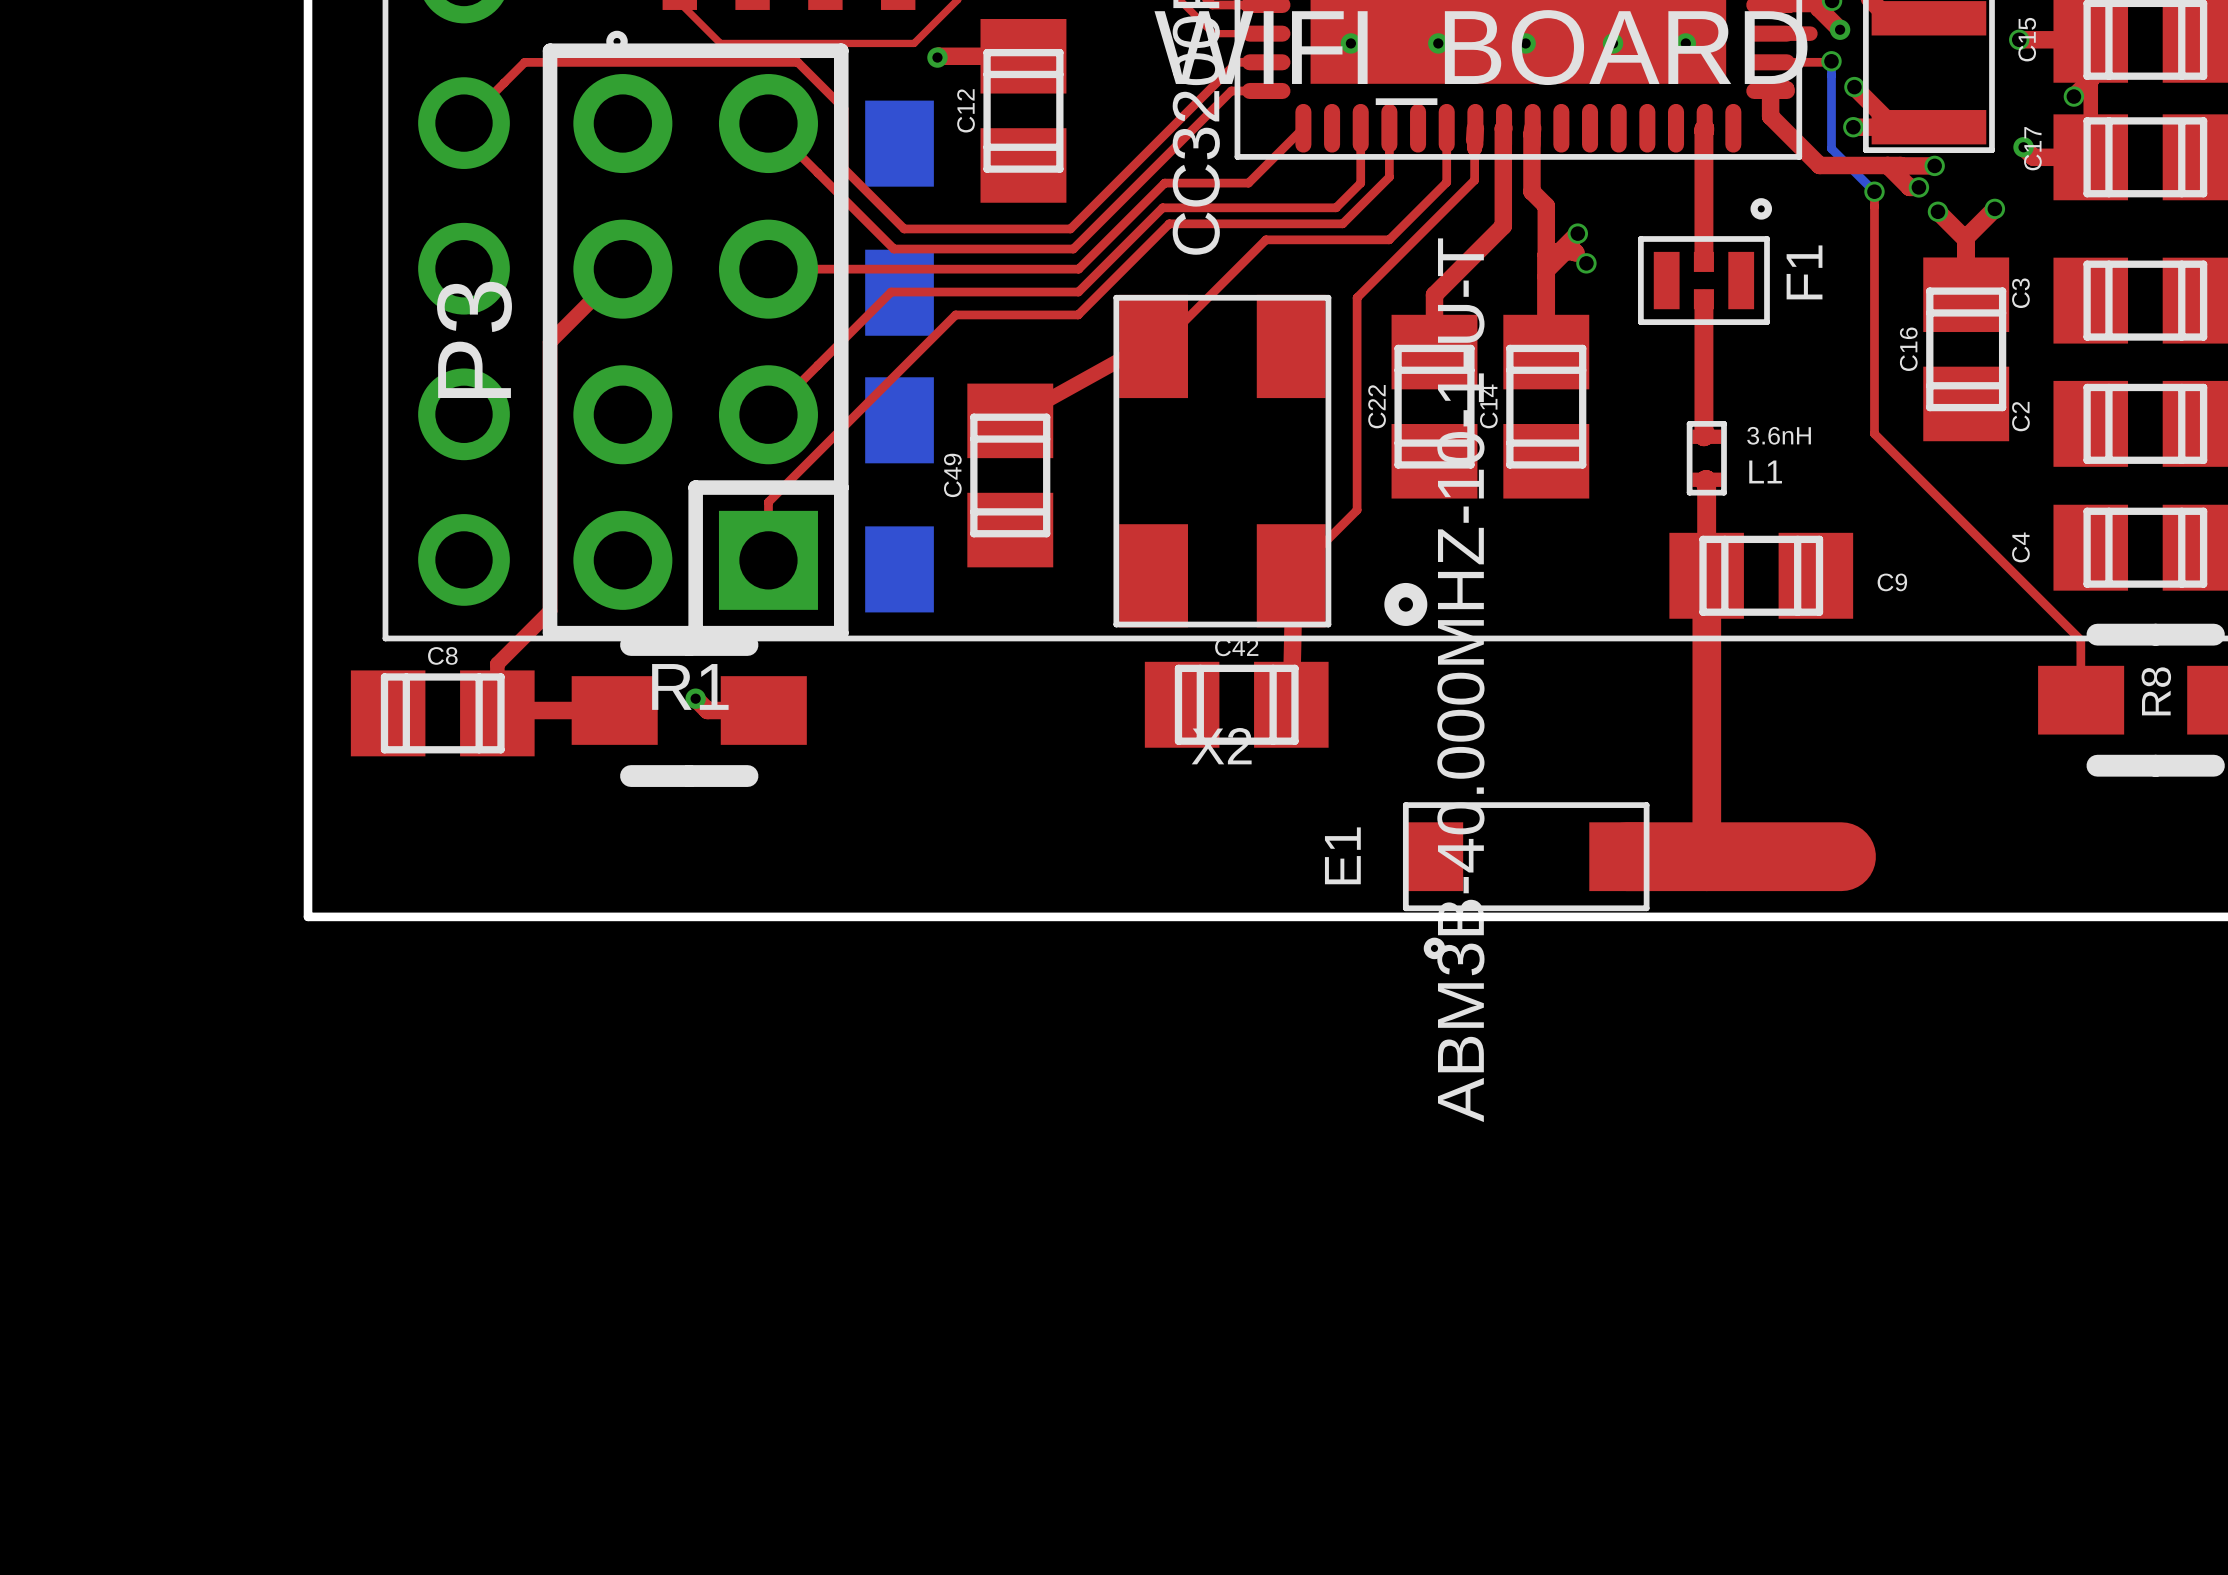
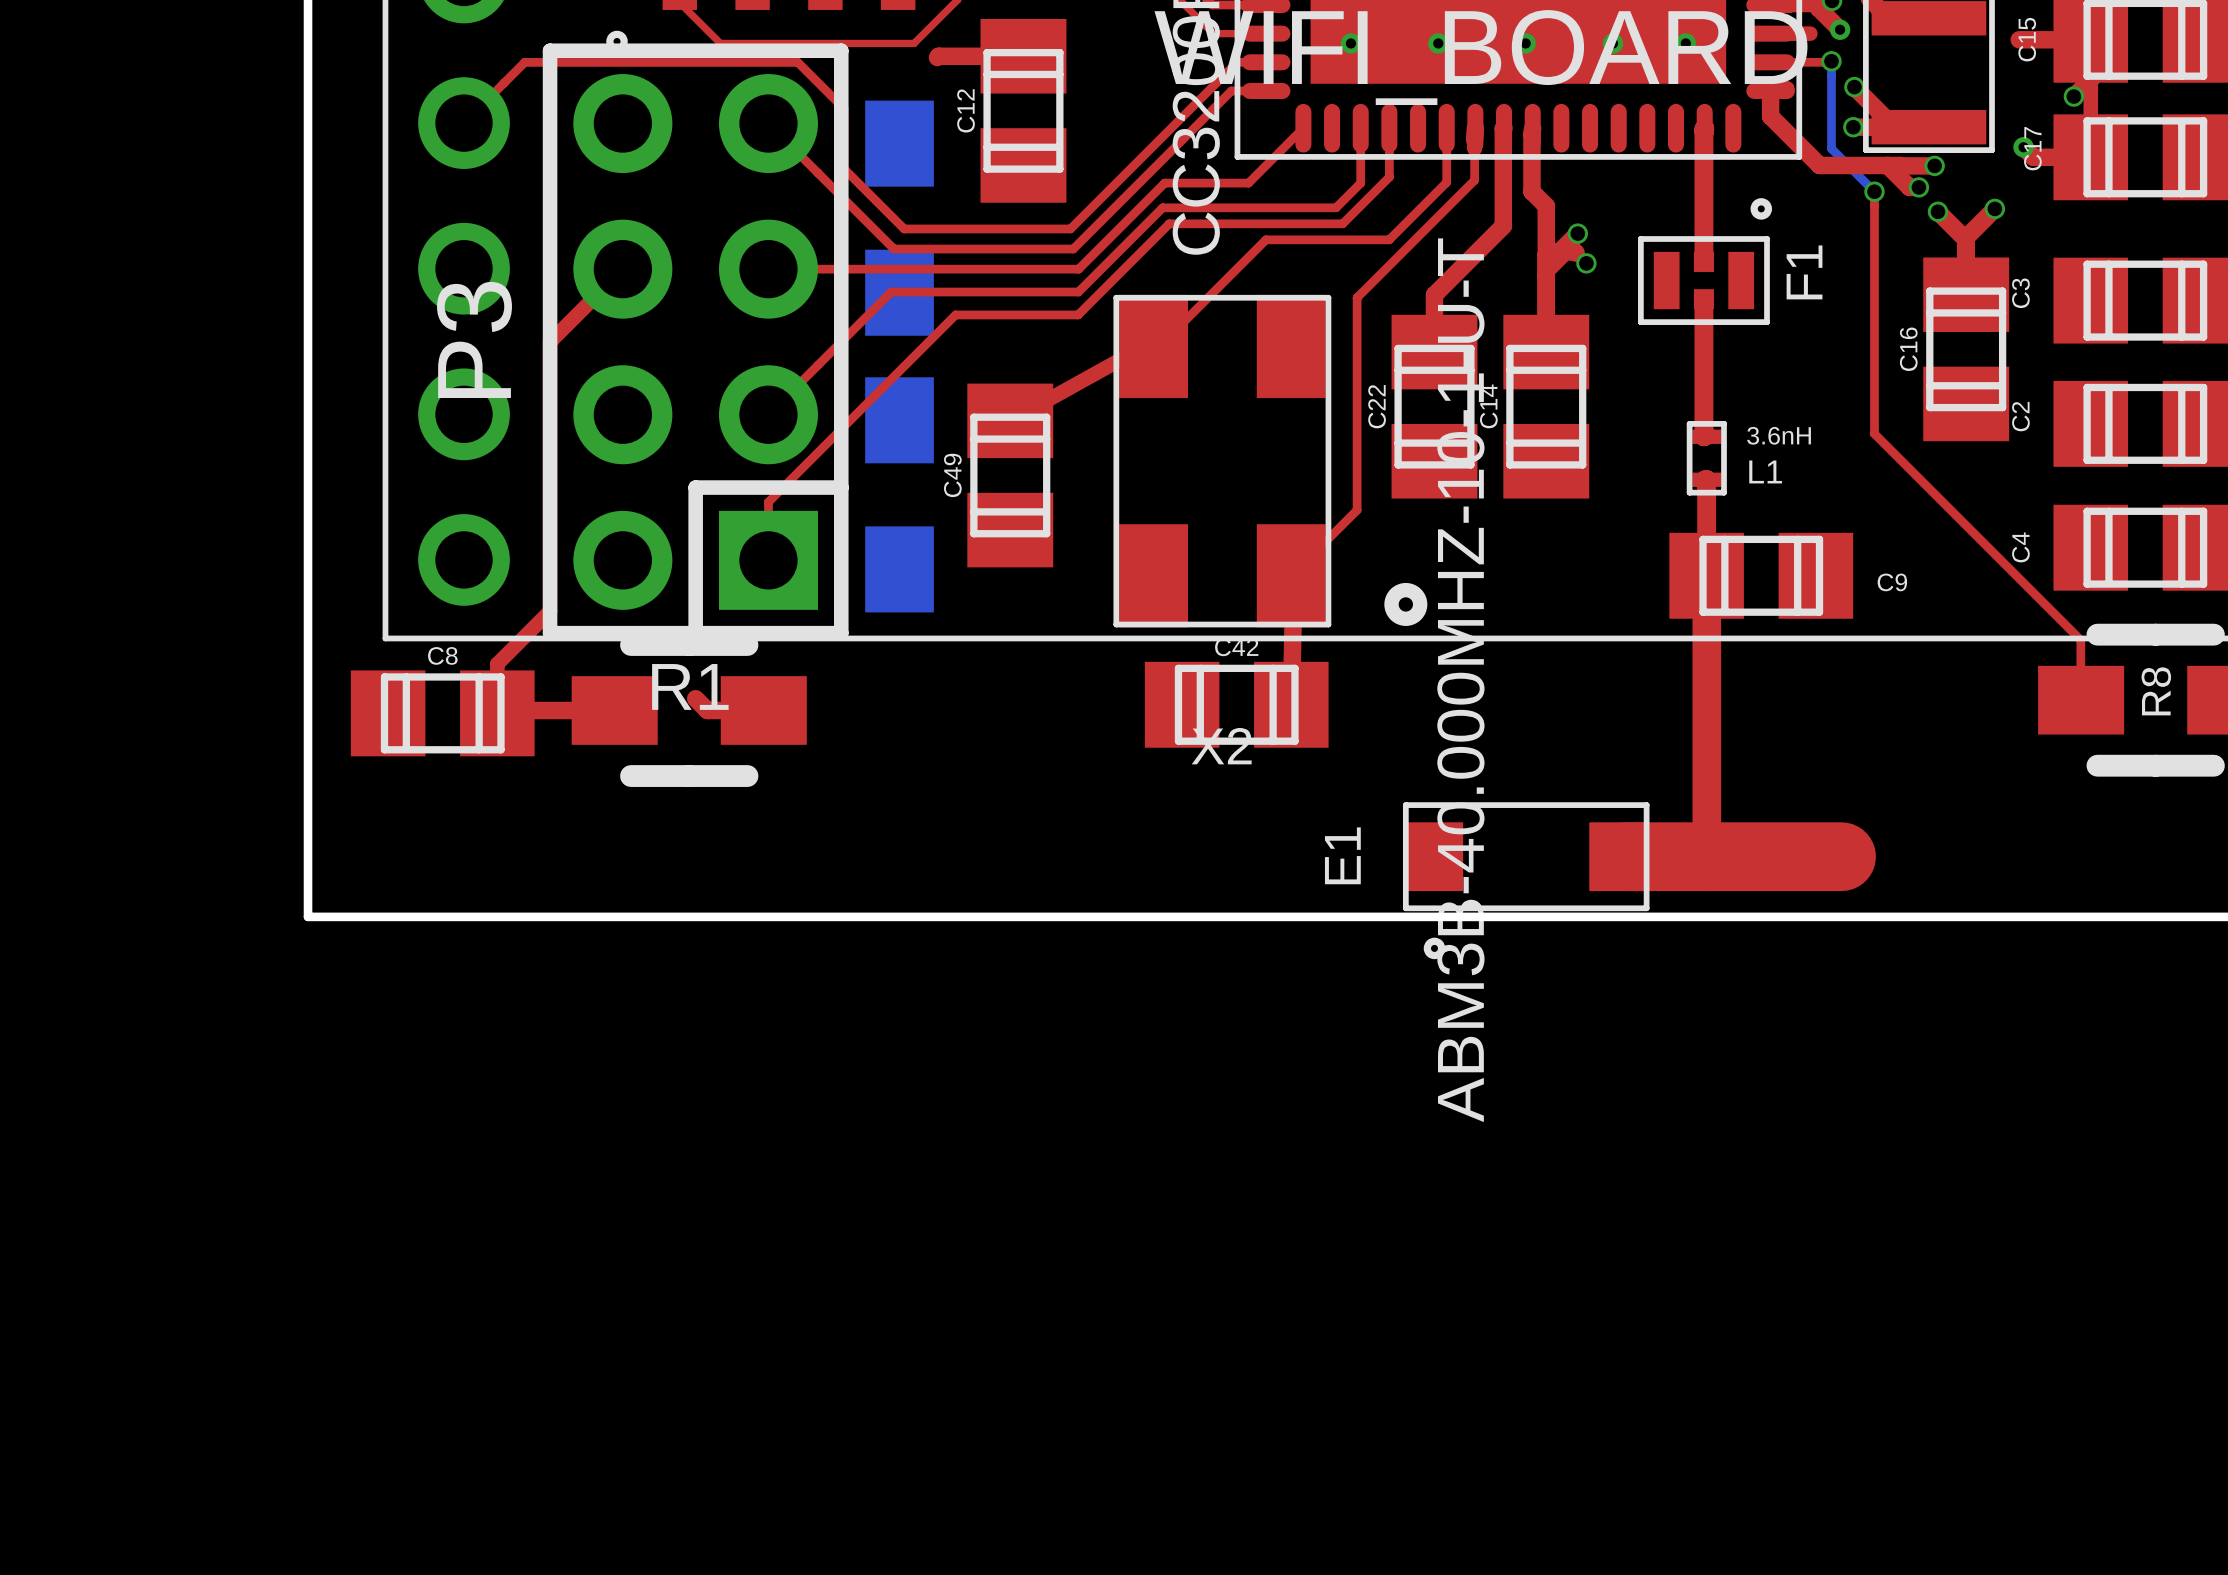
via: (2019, 39) -> none
via: (937, 57) -> none
via: (695, 698) -> none

